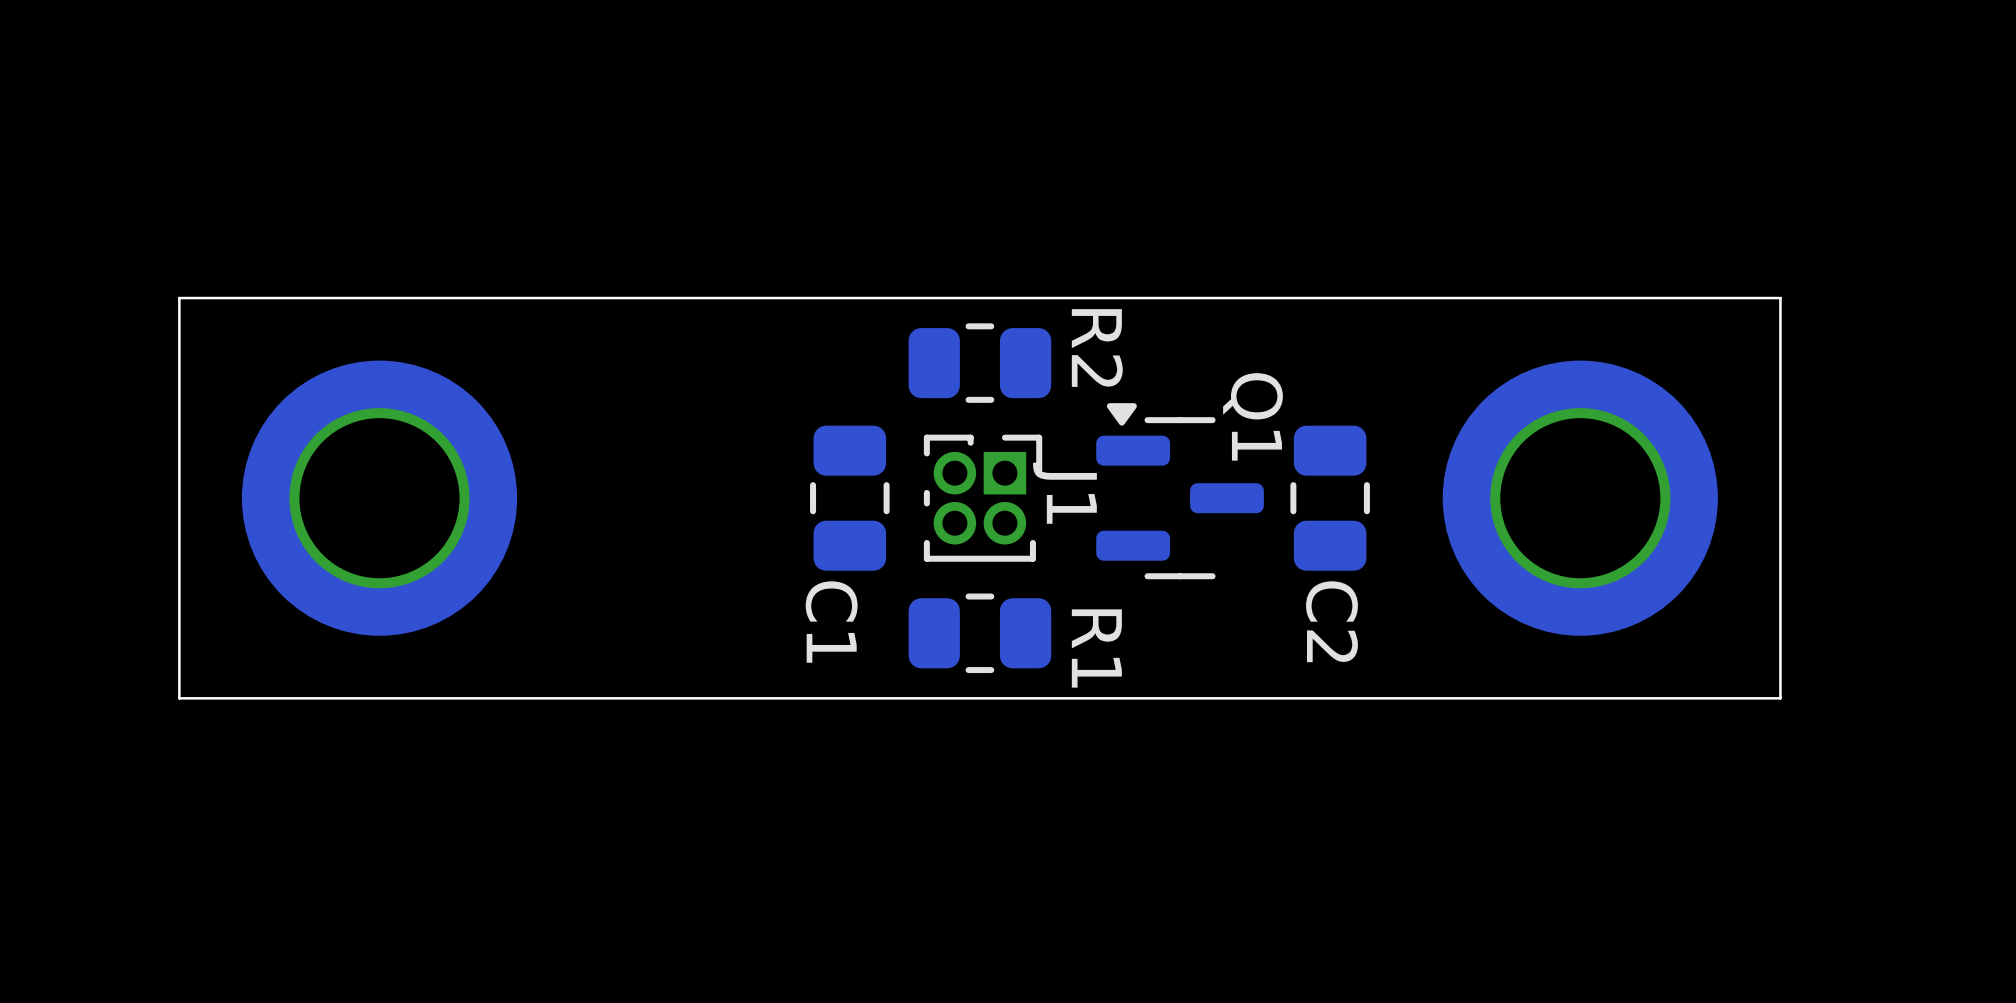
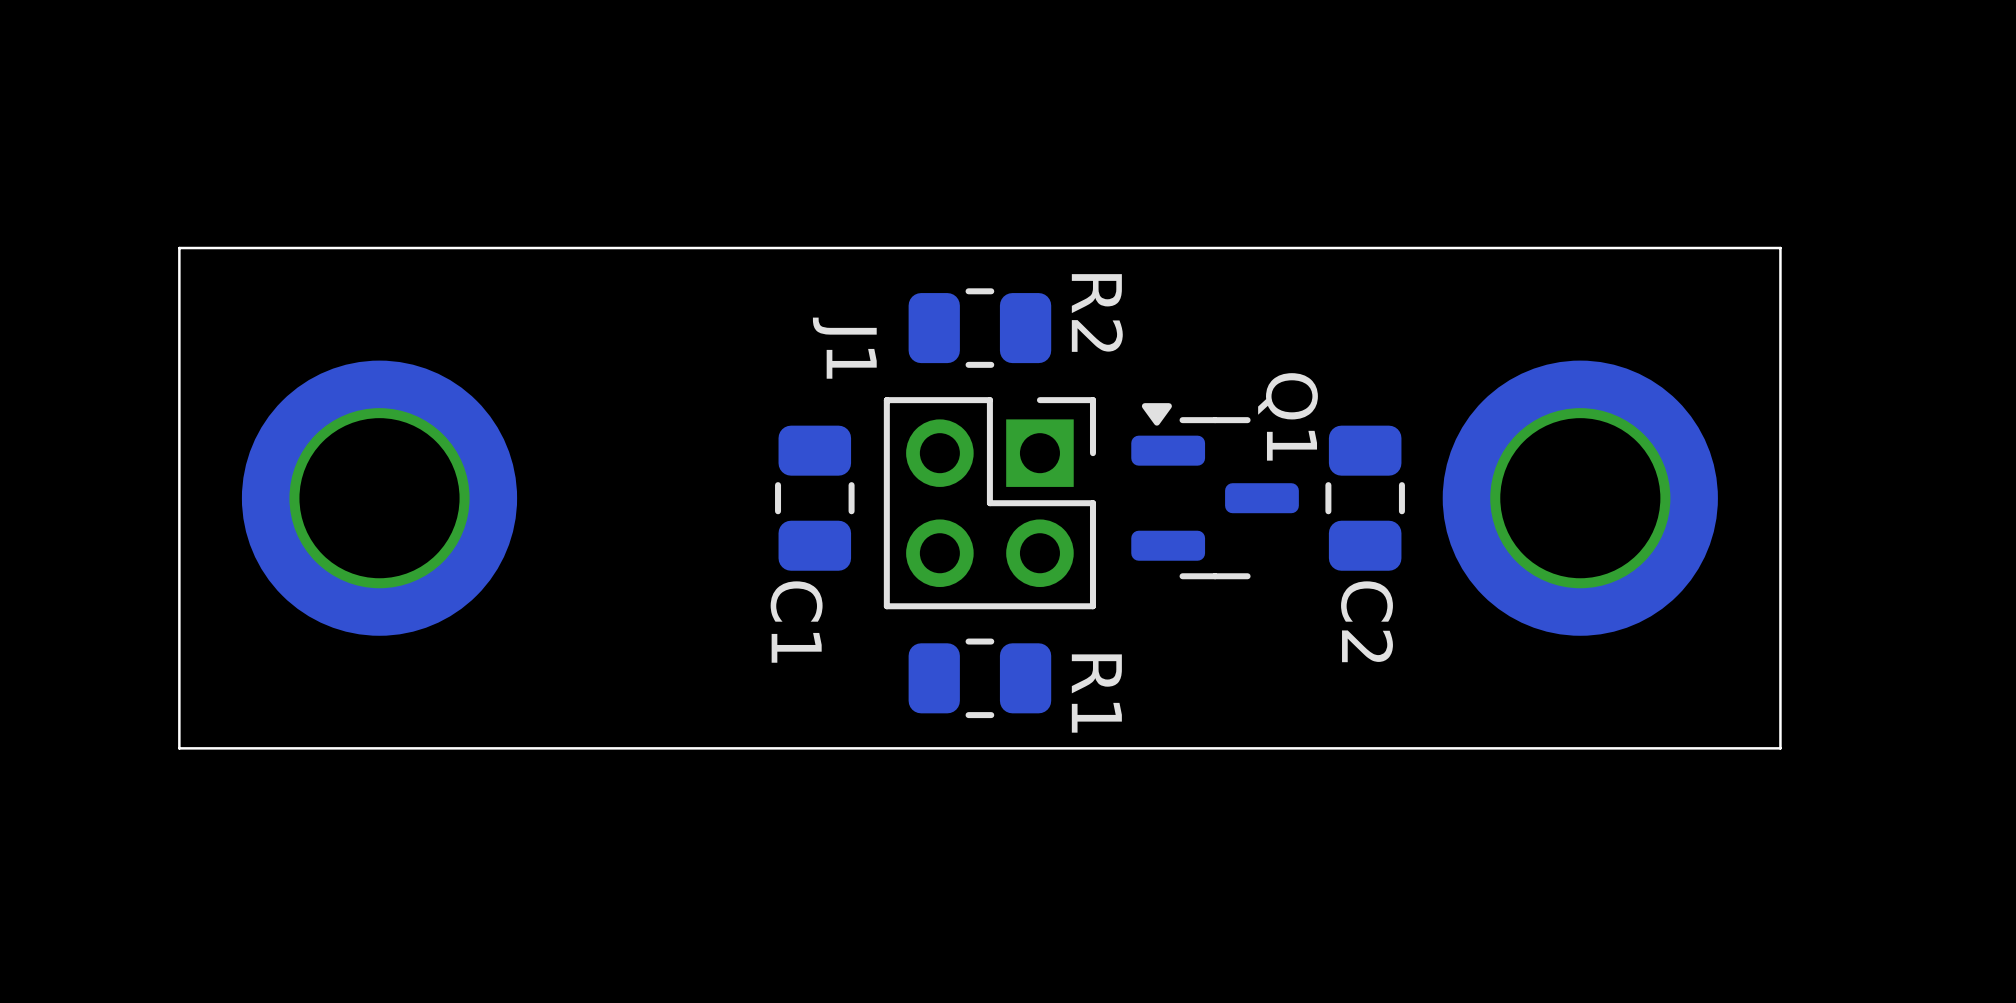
board edge: (1780, 298) (179, 298) -> (1780, 298) (1780, 248) (179, 248) (179, 298)
R2 position: (979, 363) -> (979, 328)
J1 footprint: [923, 434, 1043, 562] -> [883, 397, 1096, 610]
Q1 position: (1180, 491) -> (1215, 491)
J1 name position: J1 (1064, 493) -> J1 (844, 348)
C1 position: (849, 498) -> (814, 498)
C2 position: (1330, 498) -> (1365, 498)
R1 position: (979, 633) -> (979, 678)
board edge: (1780, 698) (179, 698) -> (1780, 698) (1780, 748) (179, 748) (179, 698)

